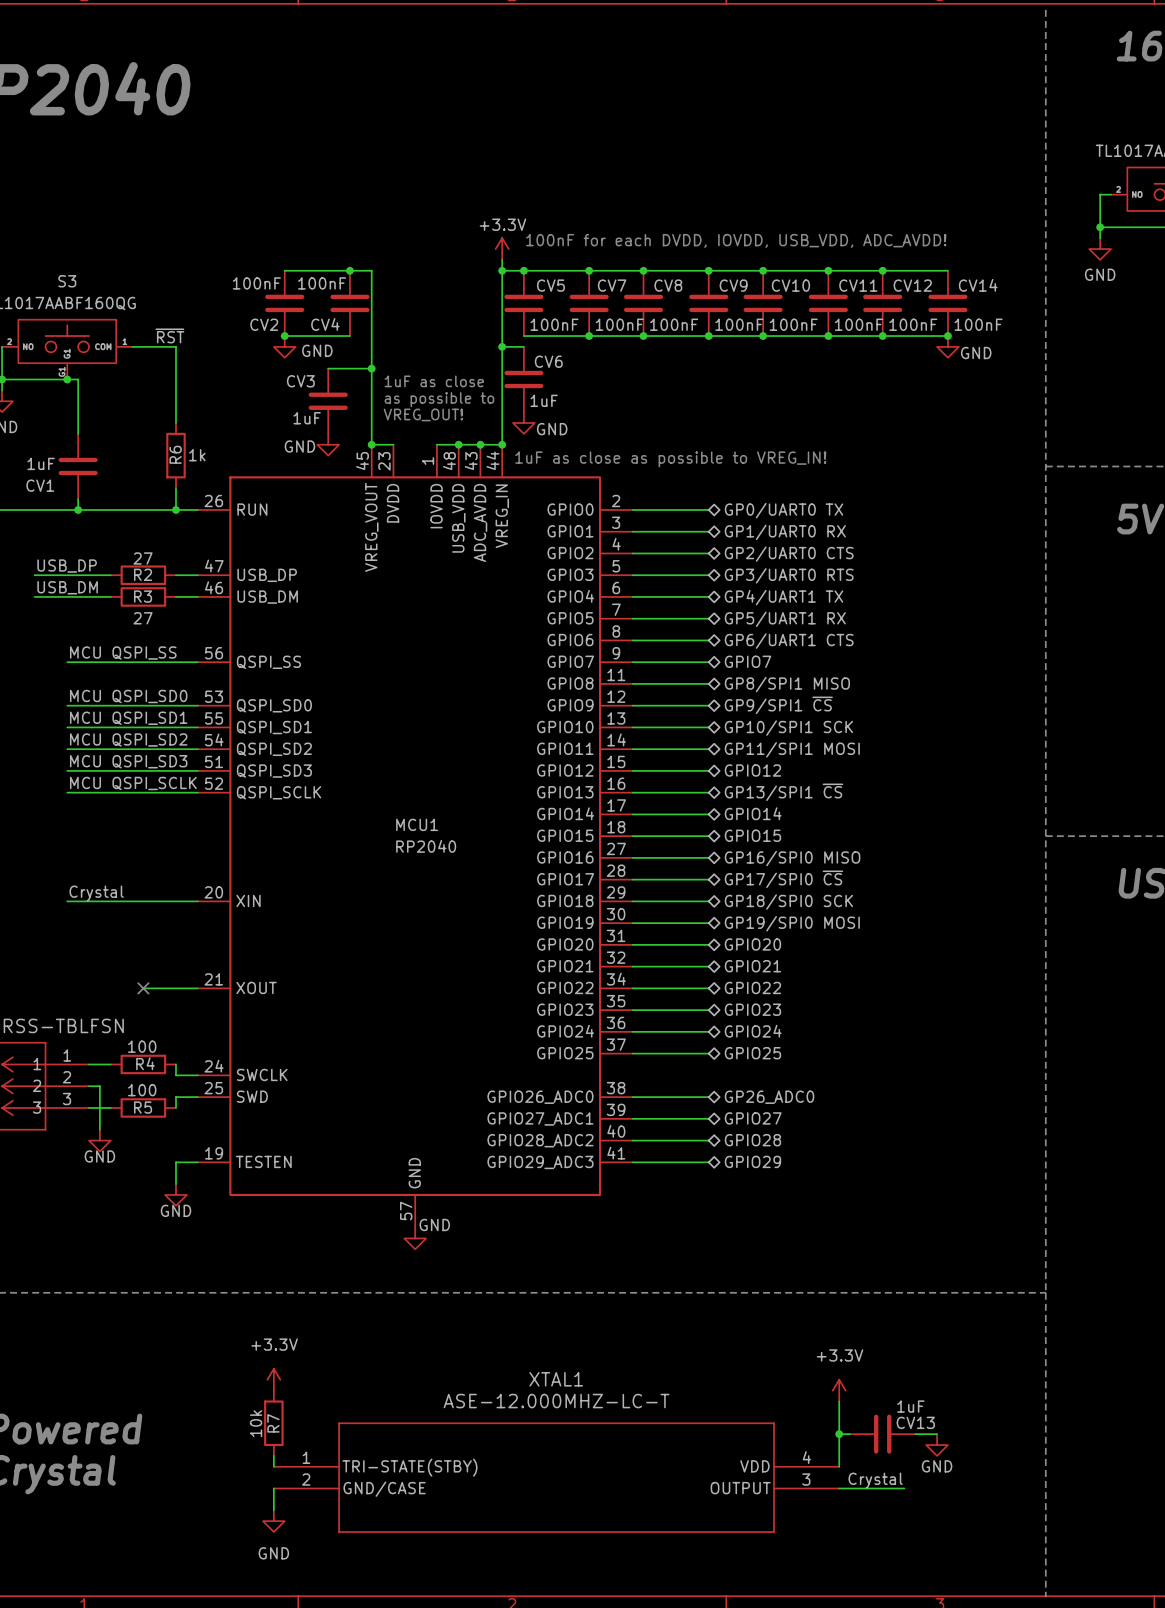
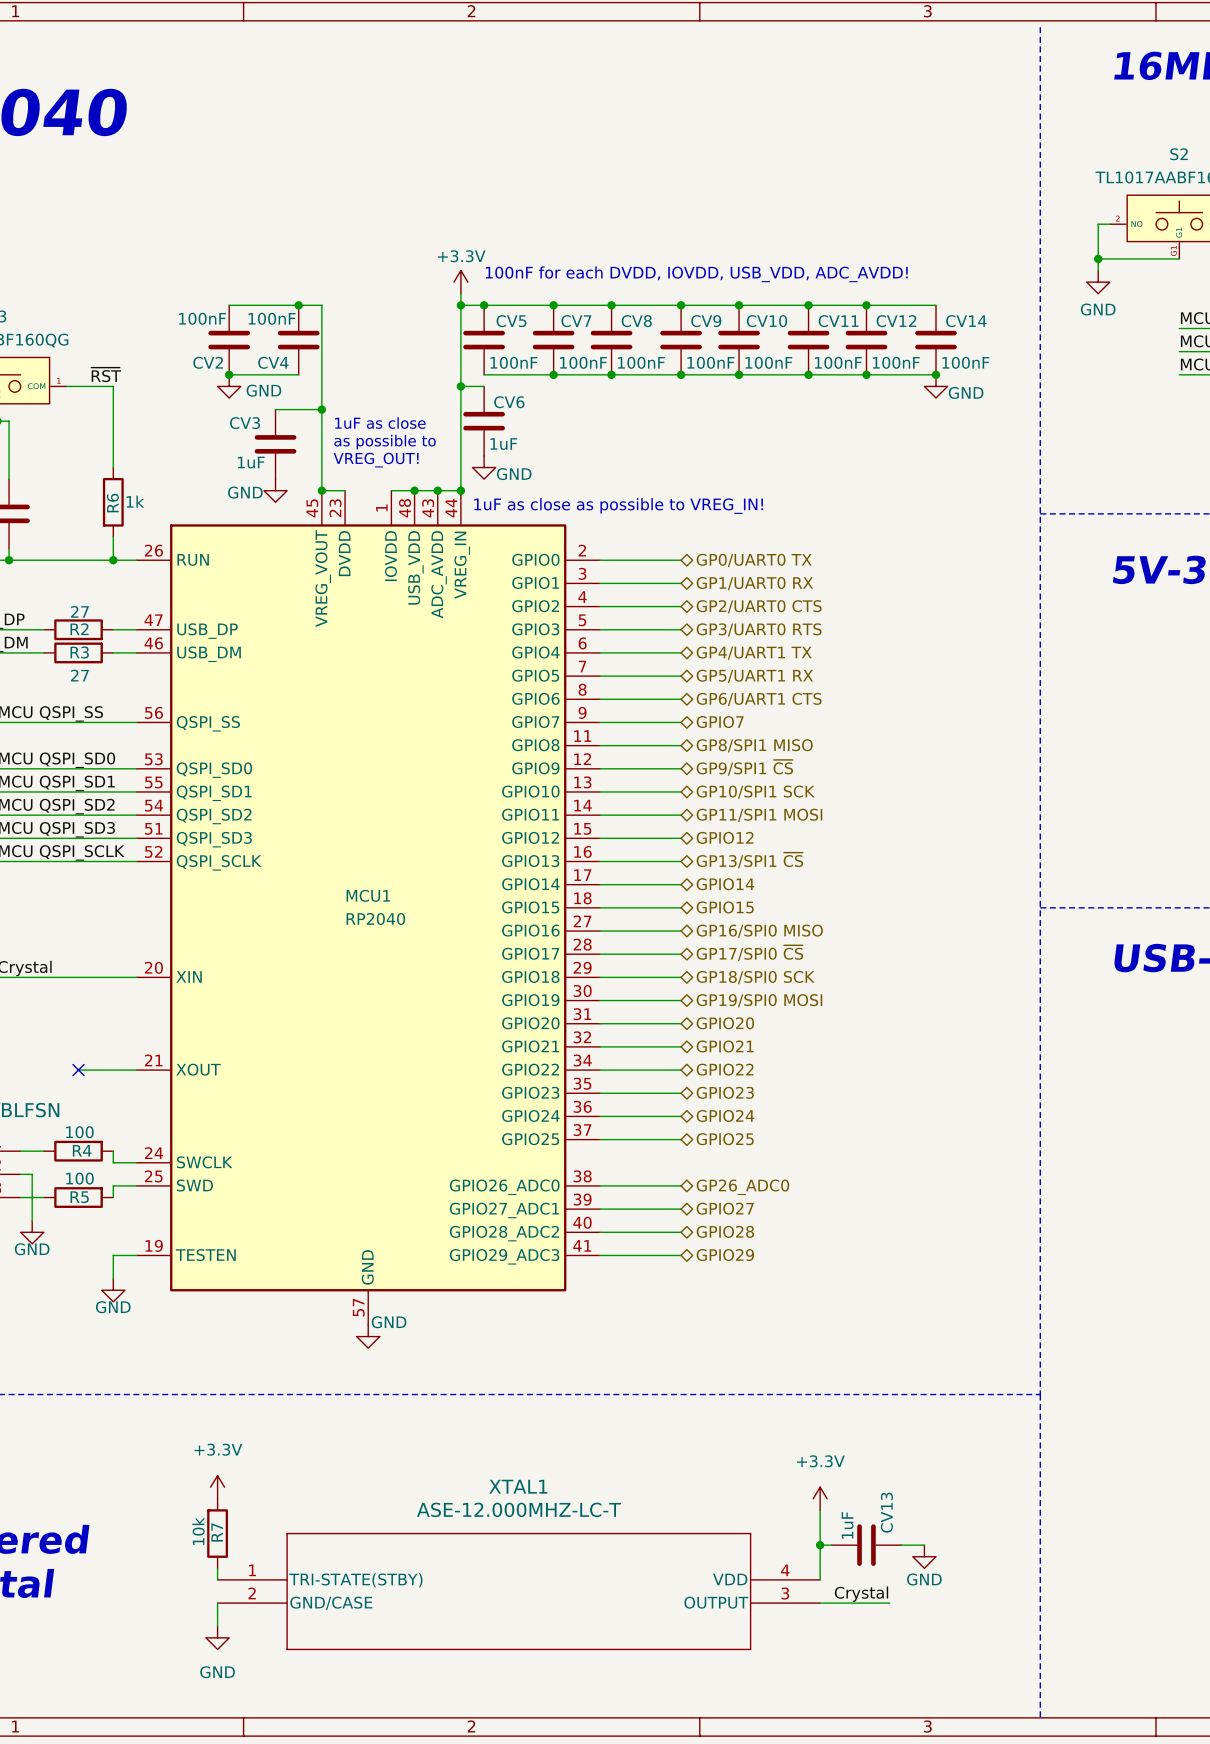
CV13 value rotation: 0° (910, 1406) -> 90° counterclockwise (847, 1525)
CV13 value position: 1uF (910, 1406) -> 1uF (847, 1525)
CV13 name rotation: 0° (915, 1422) -> 90° counterclockwise (886, 1512)

